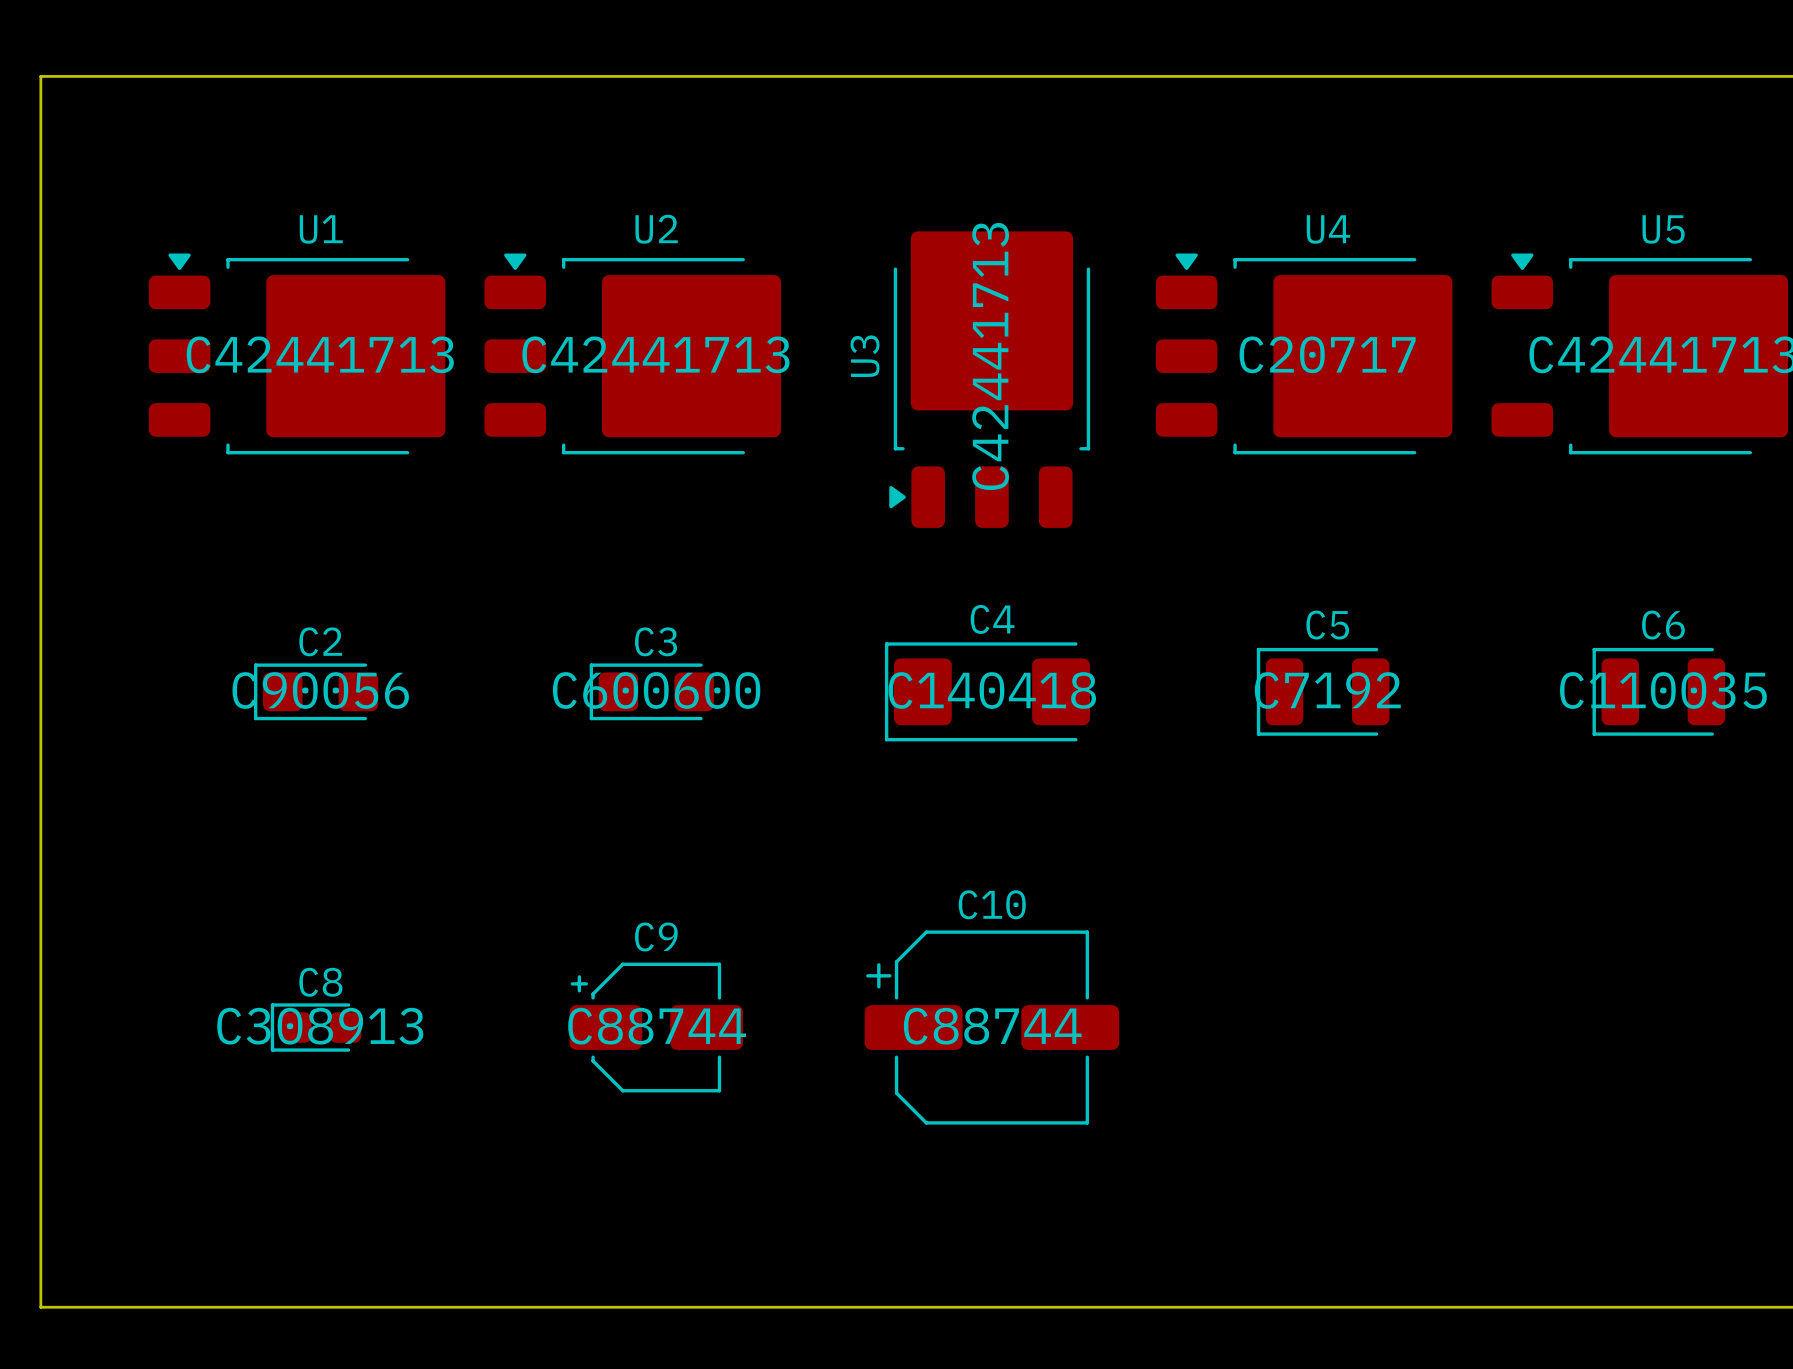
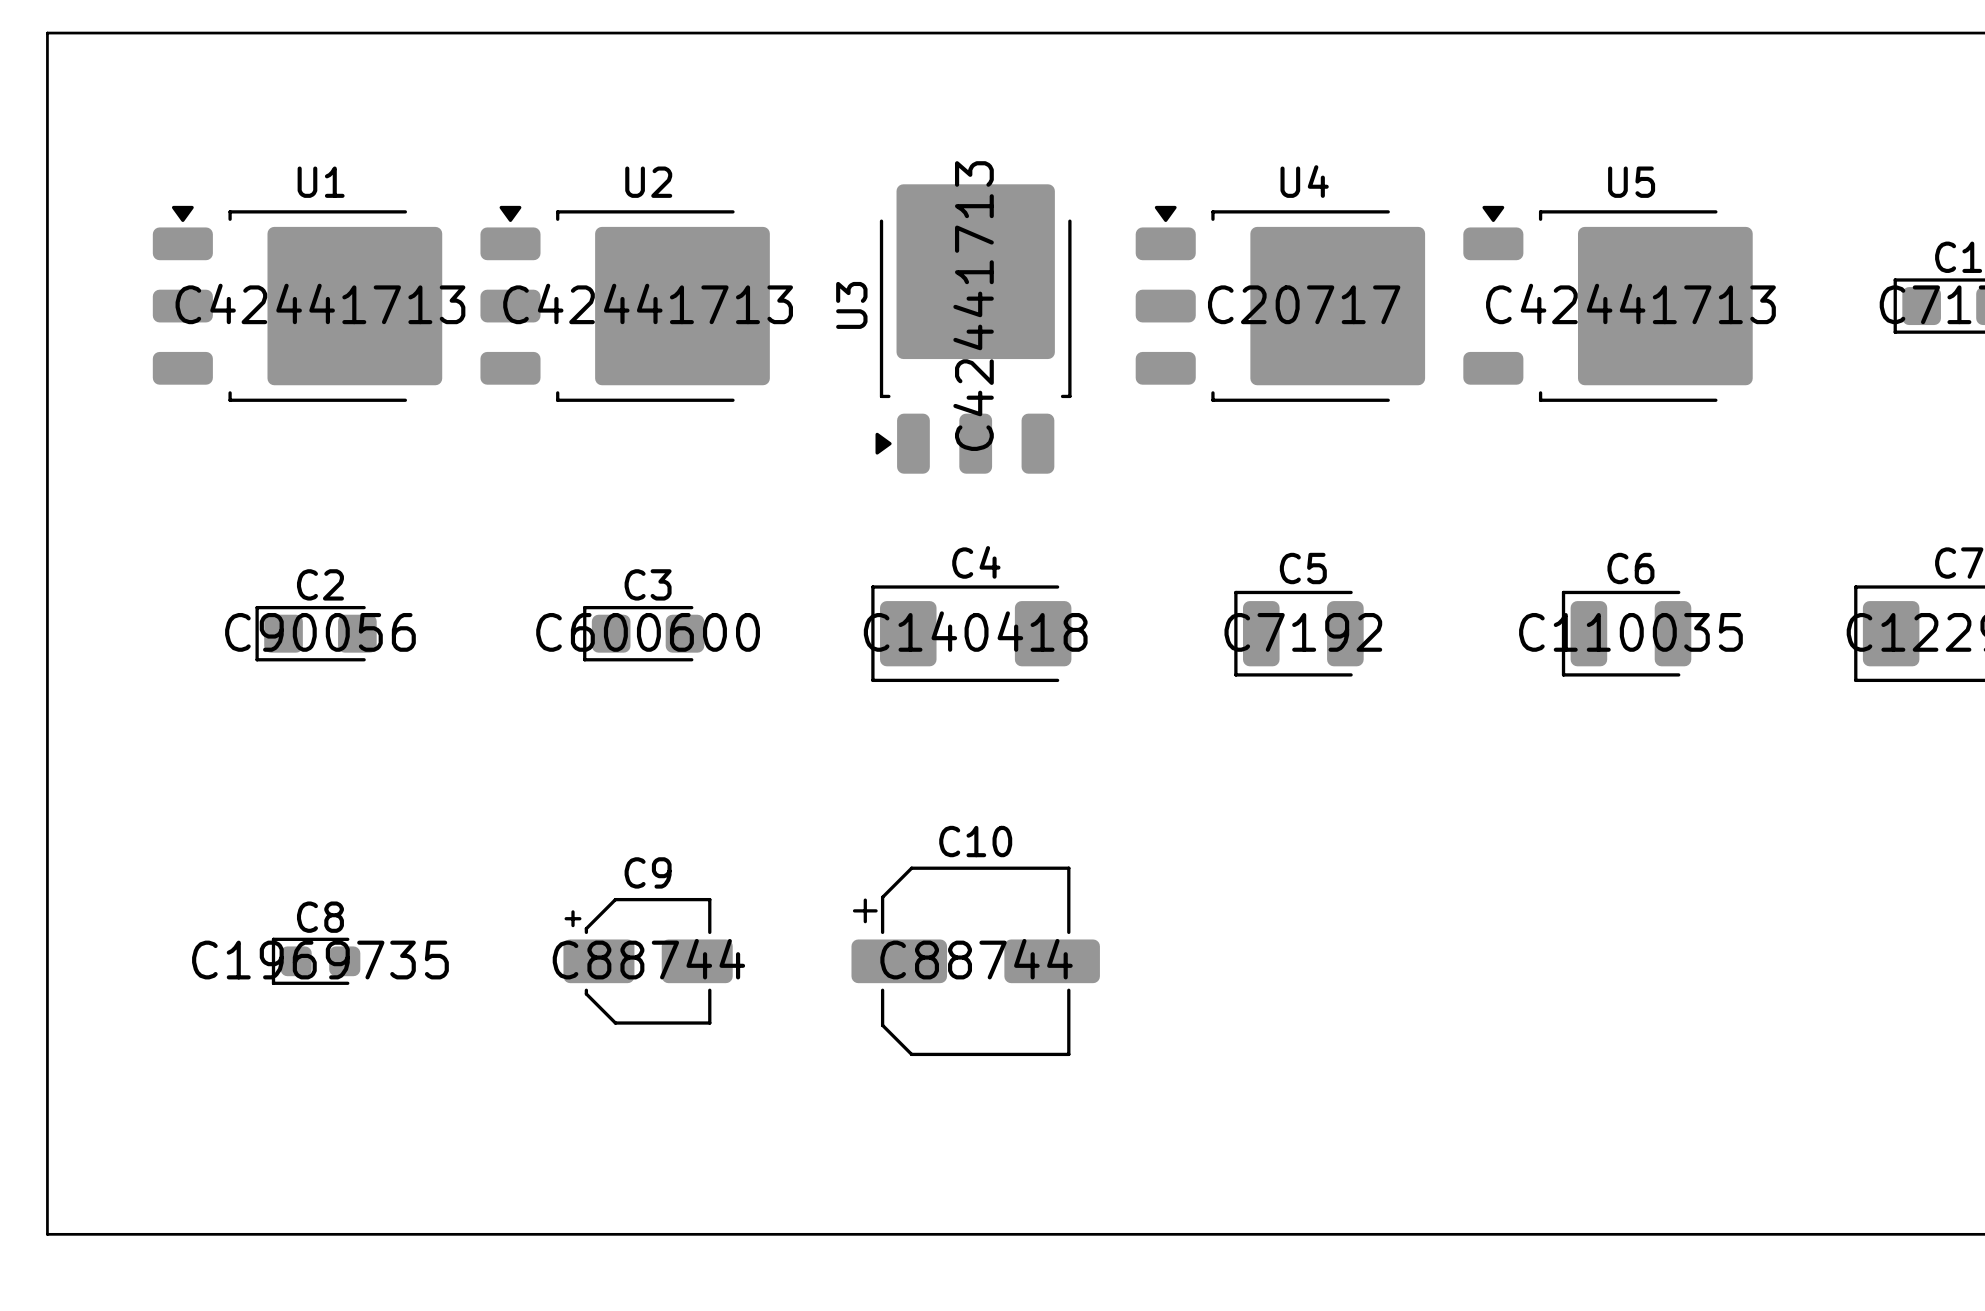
C8 text: C308913 (320, 1026) -> C1969735 (320, 960)

